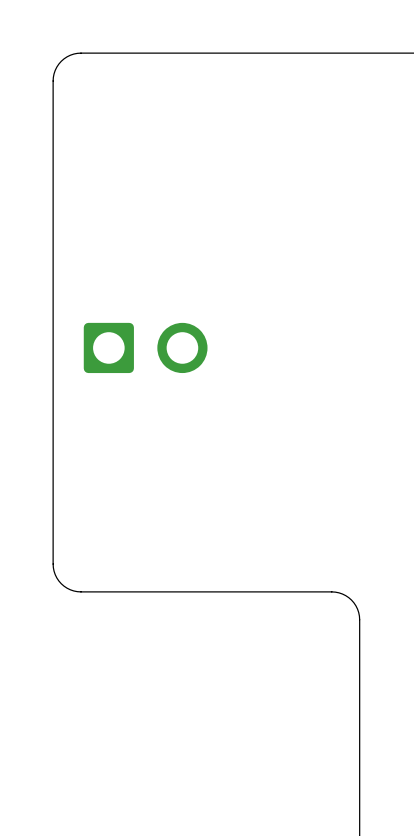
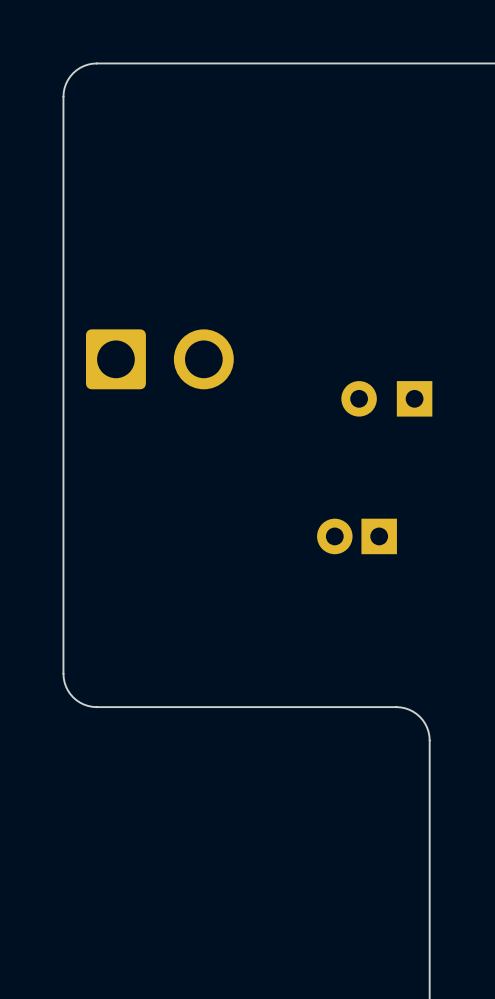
part: none -> (386, 398)
part position: (145, 347) -> (159, 359)
part: none -> (357, 536)

